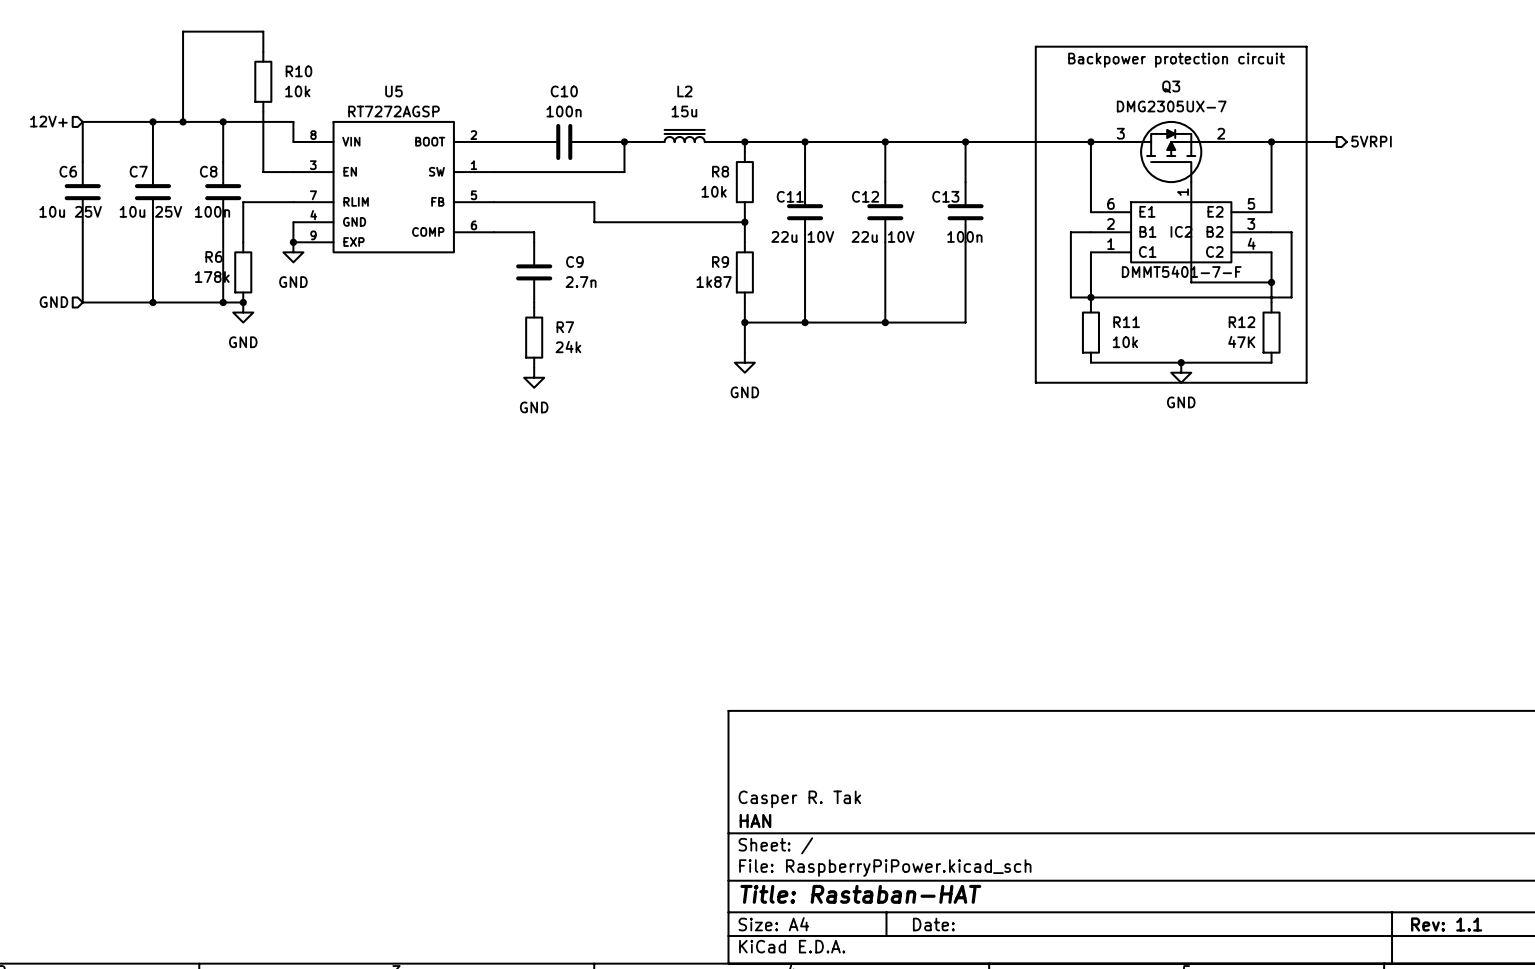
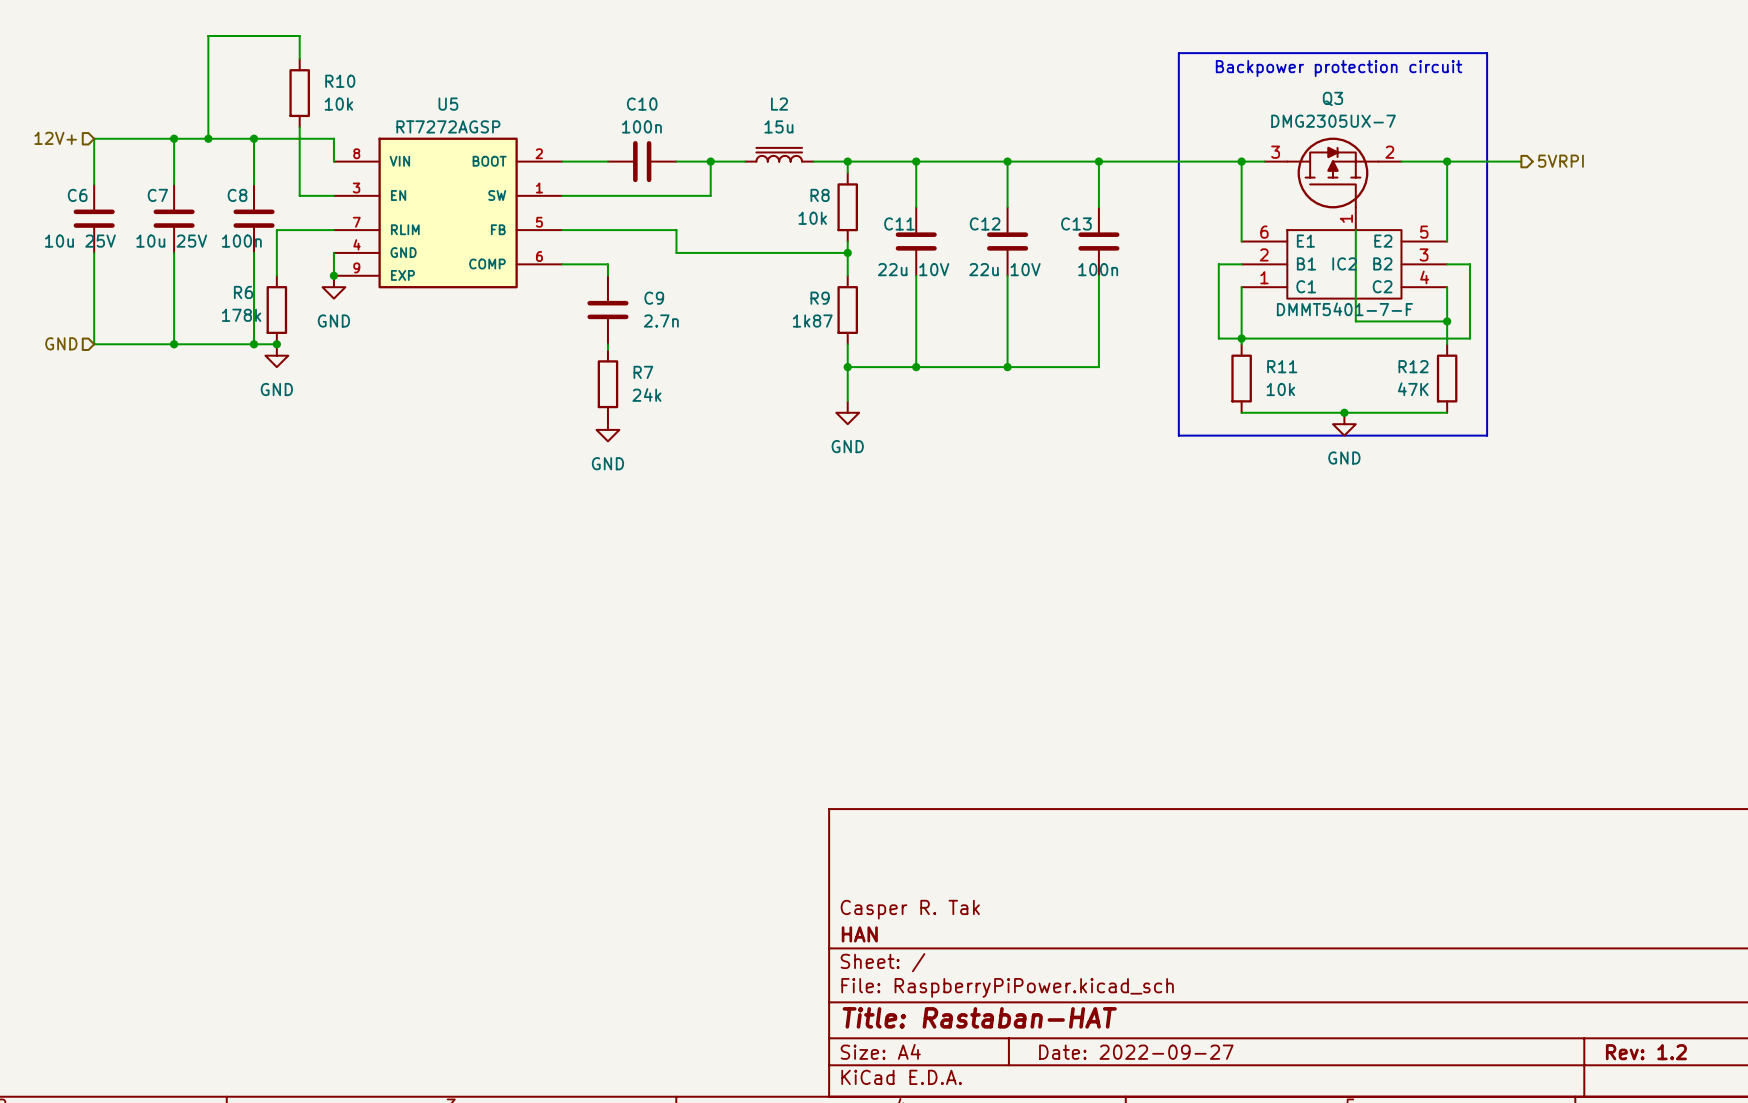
title block: Date: (933, 924) -> Date: 2022-09-27 (1136, 1052)
title block: Rev: 1.1 (1446, 924) -> Rev: 1.2 (1646, 1052)

